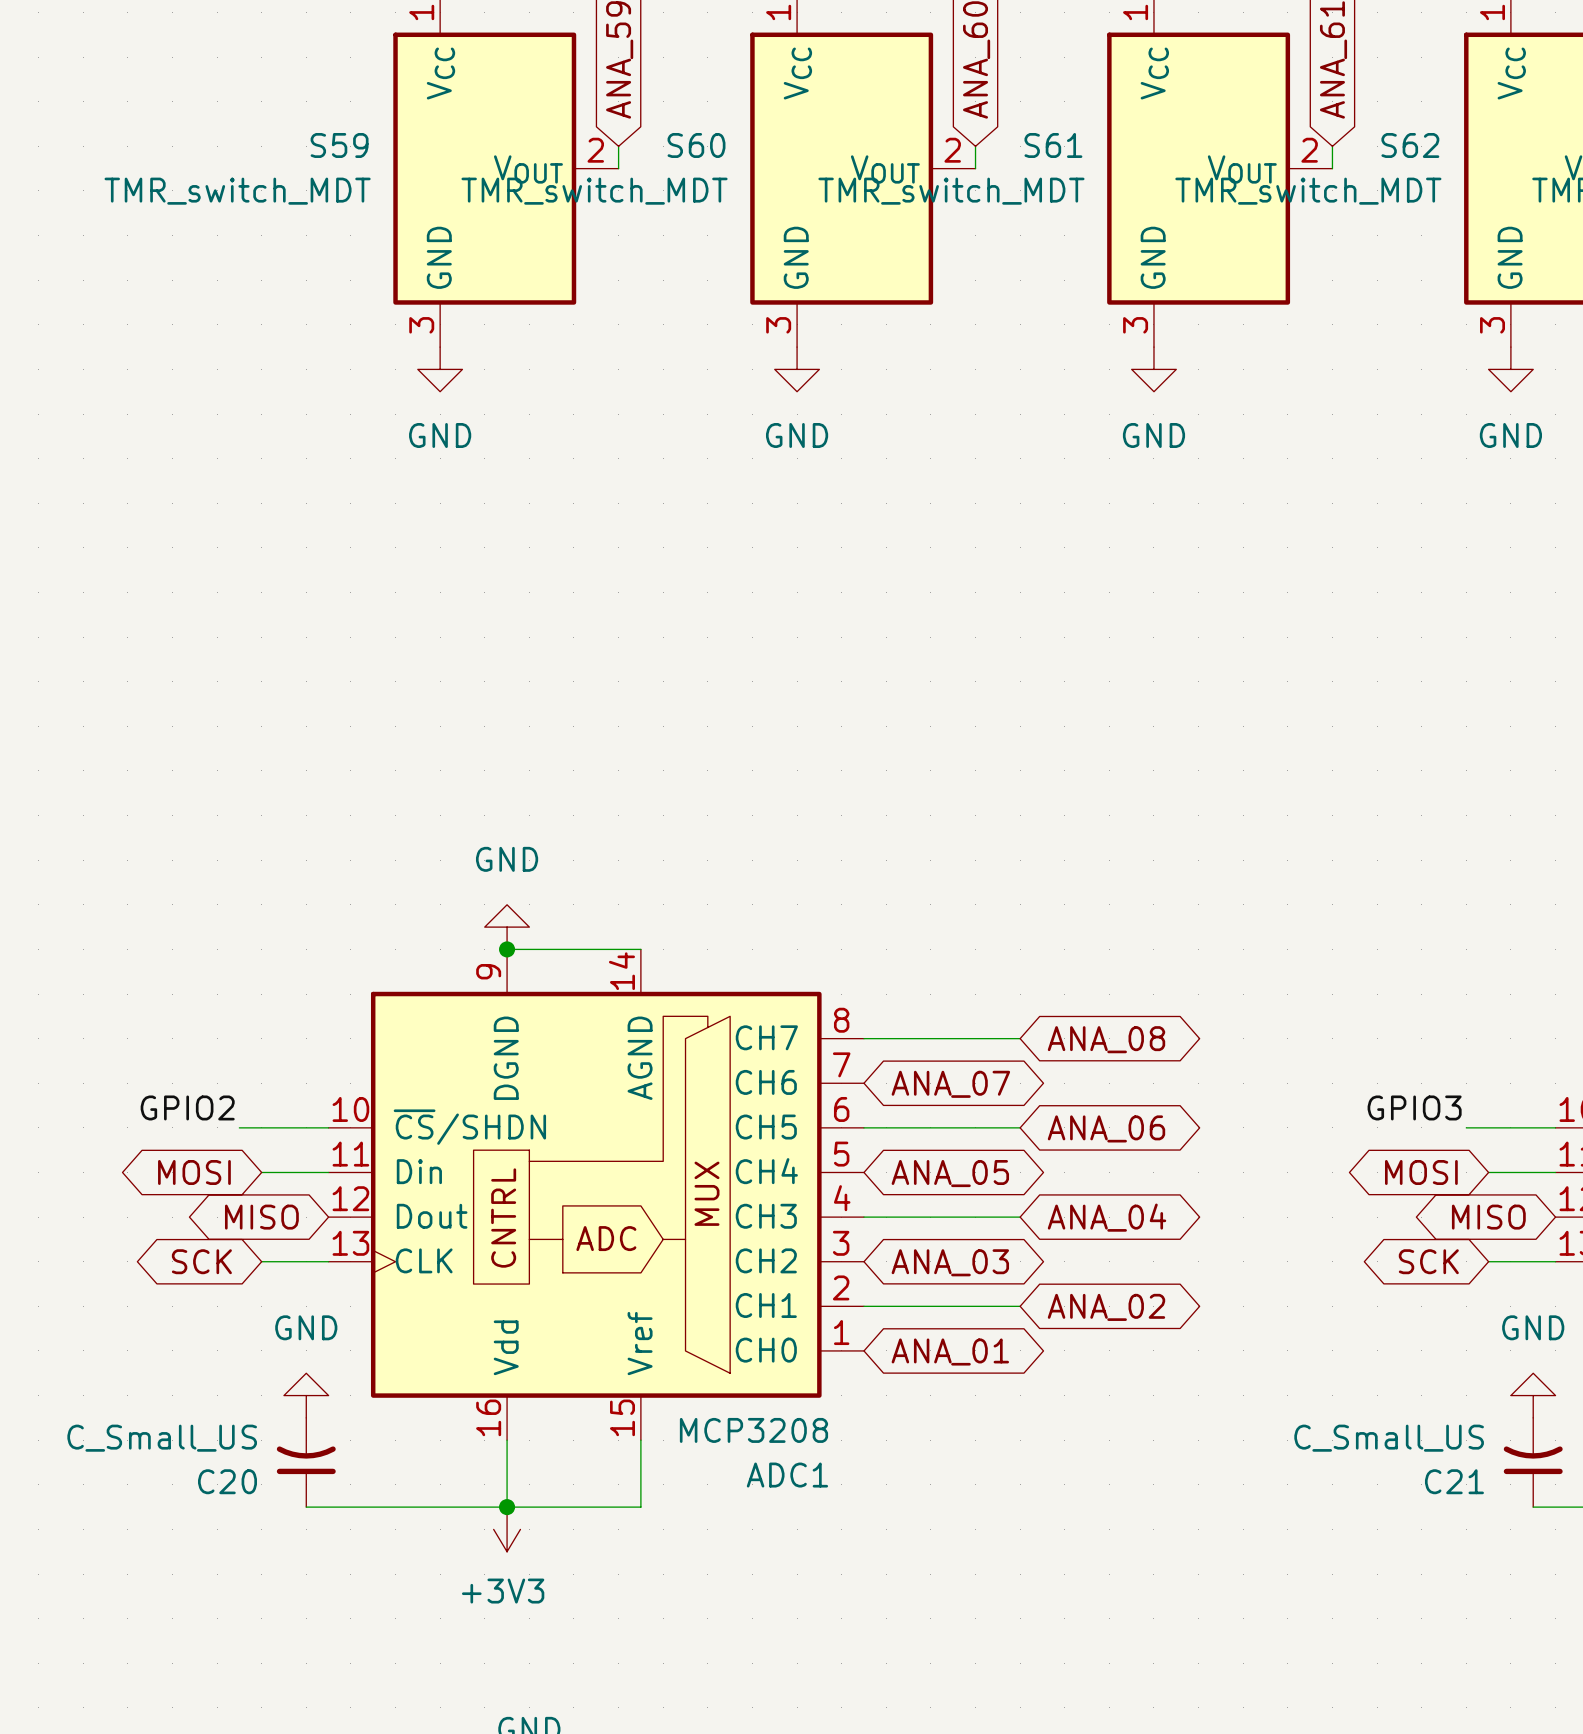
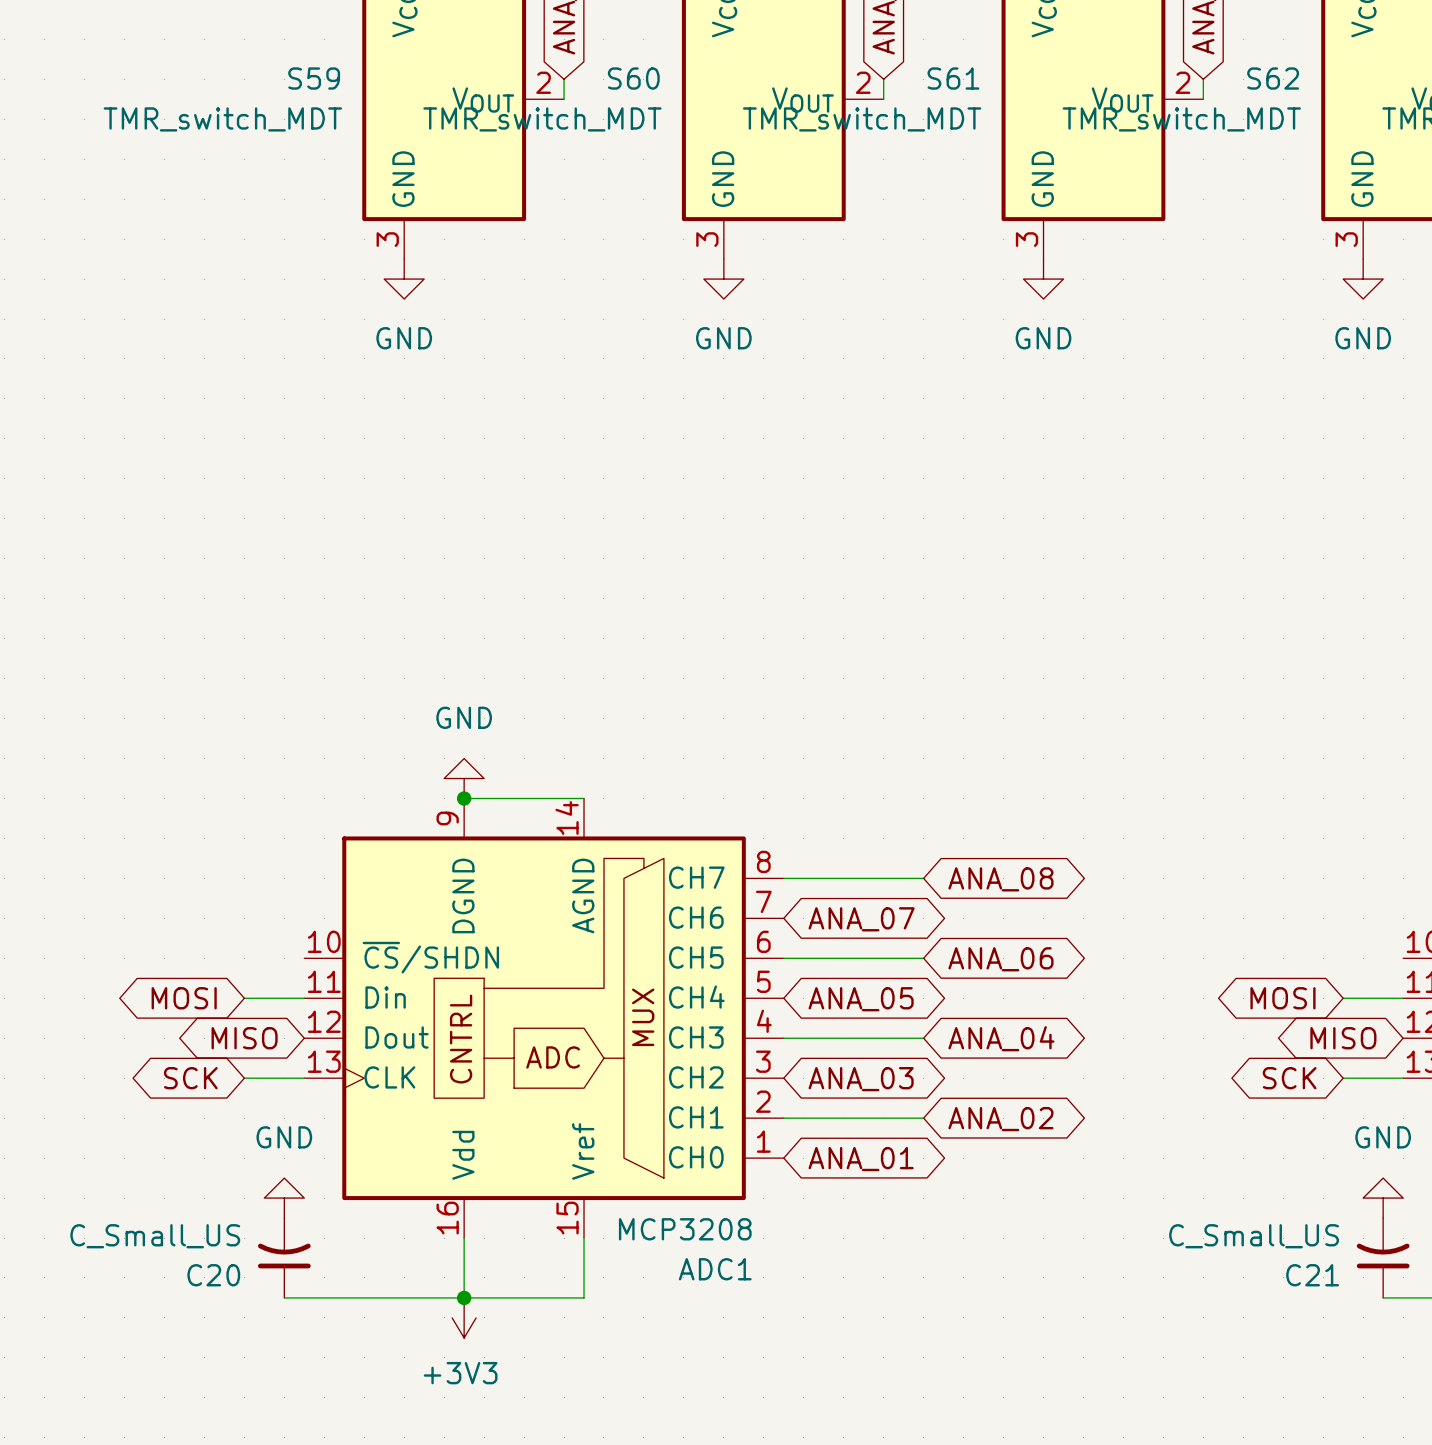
label: GPIO2 (187, 1107) -> none
label: GPIO3 (1414, 1107) -> none
wire: (239, 1127) (328, 1127) -> none
wire: (1466, 1127) (1555, 1127) -> none

